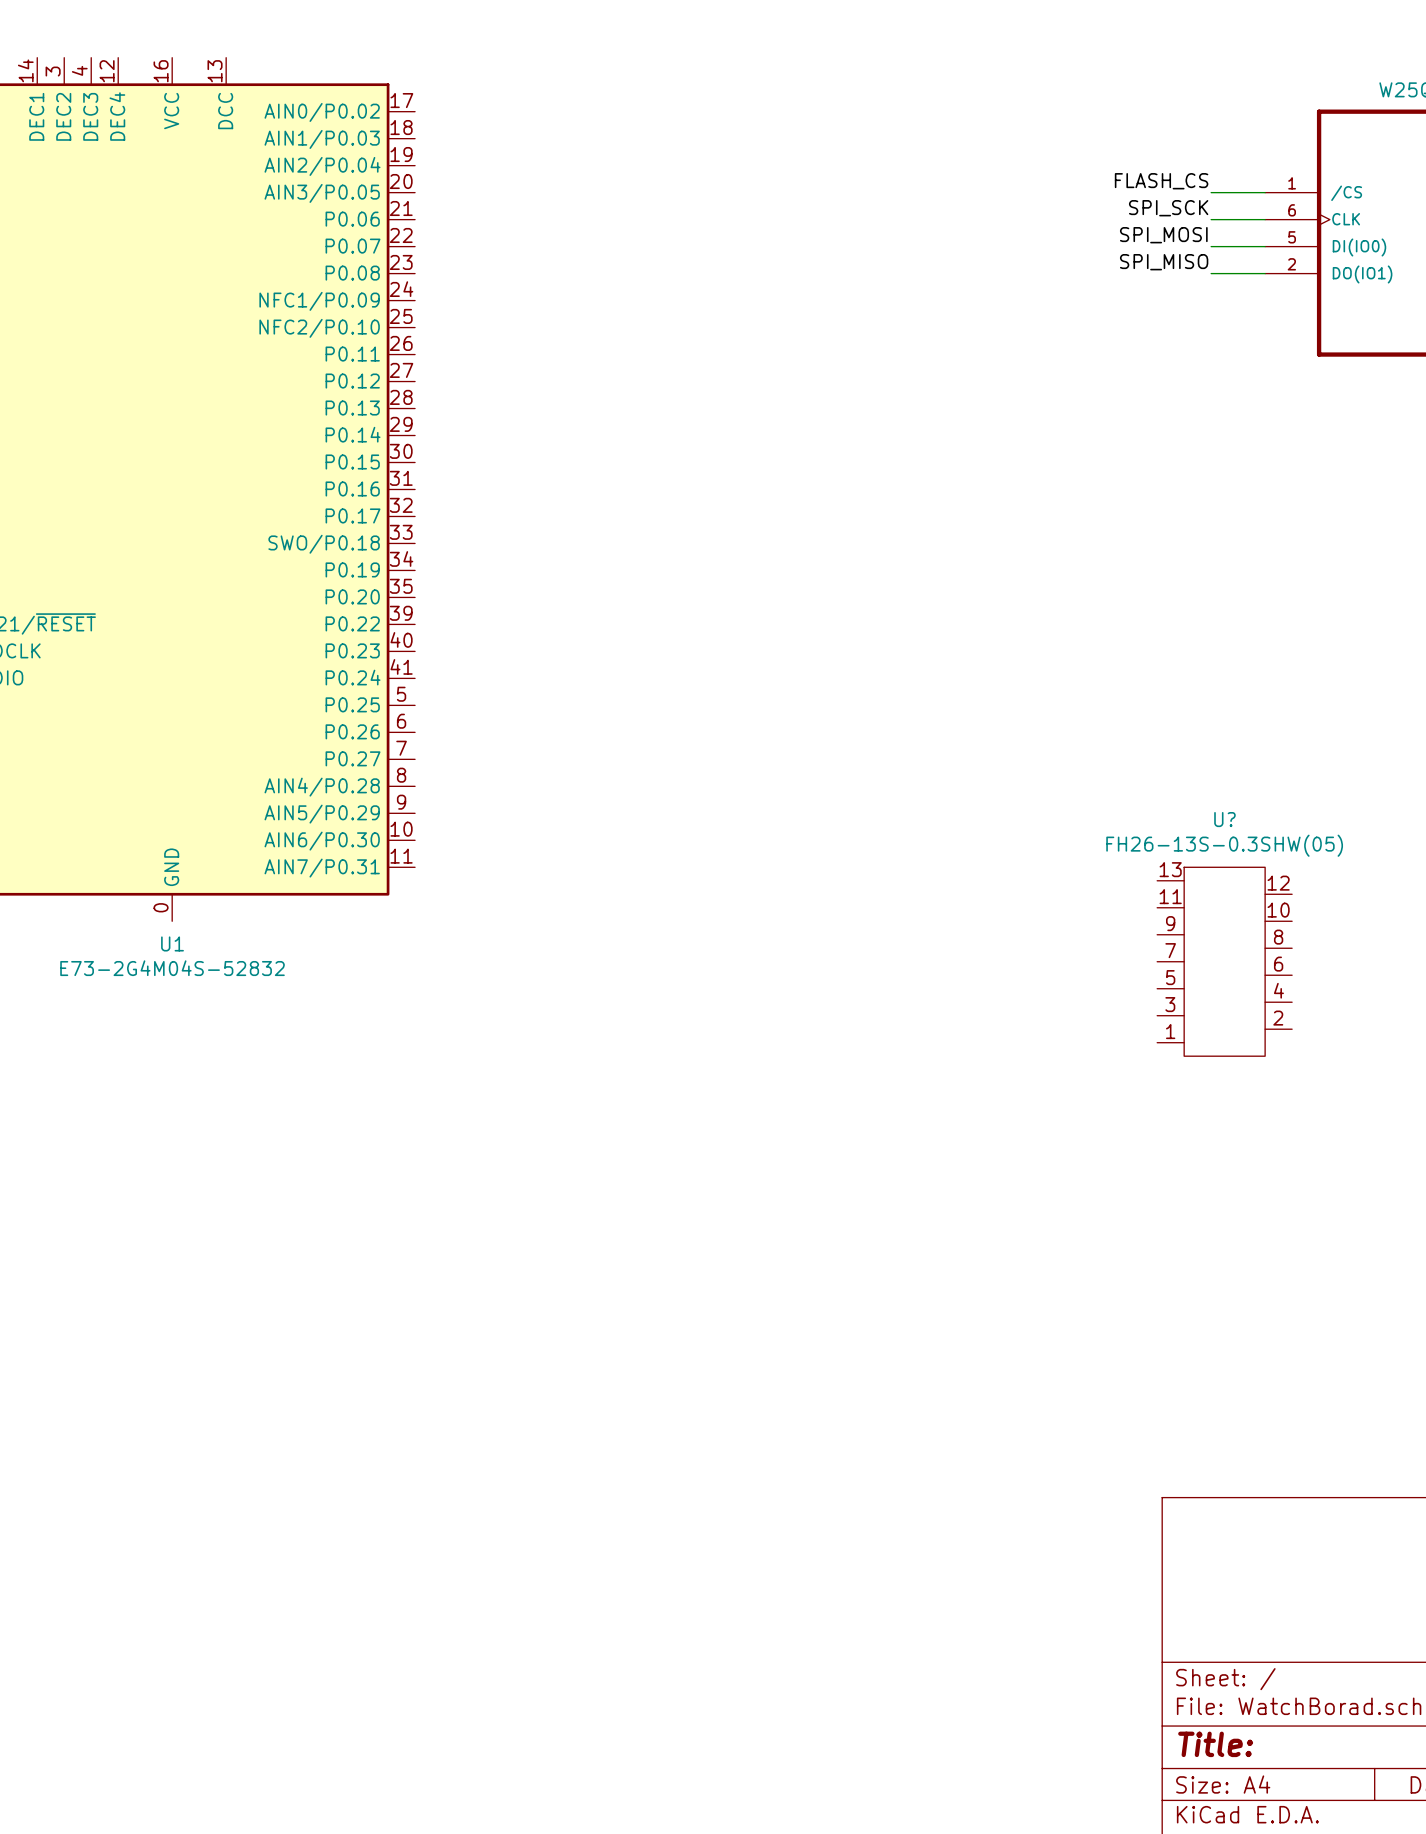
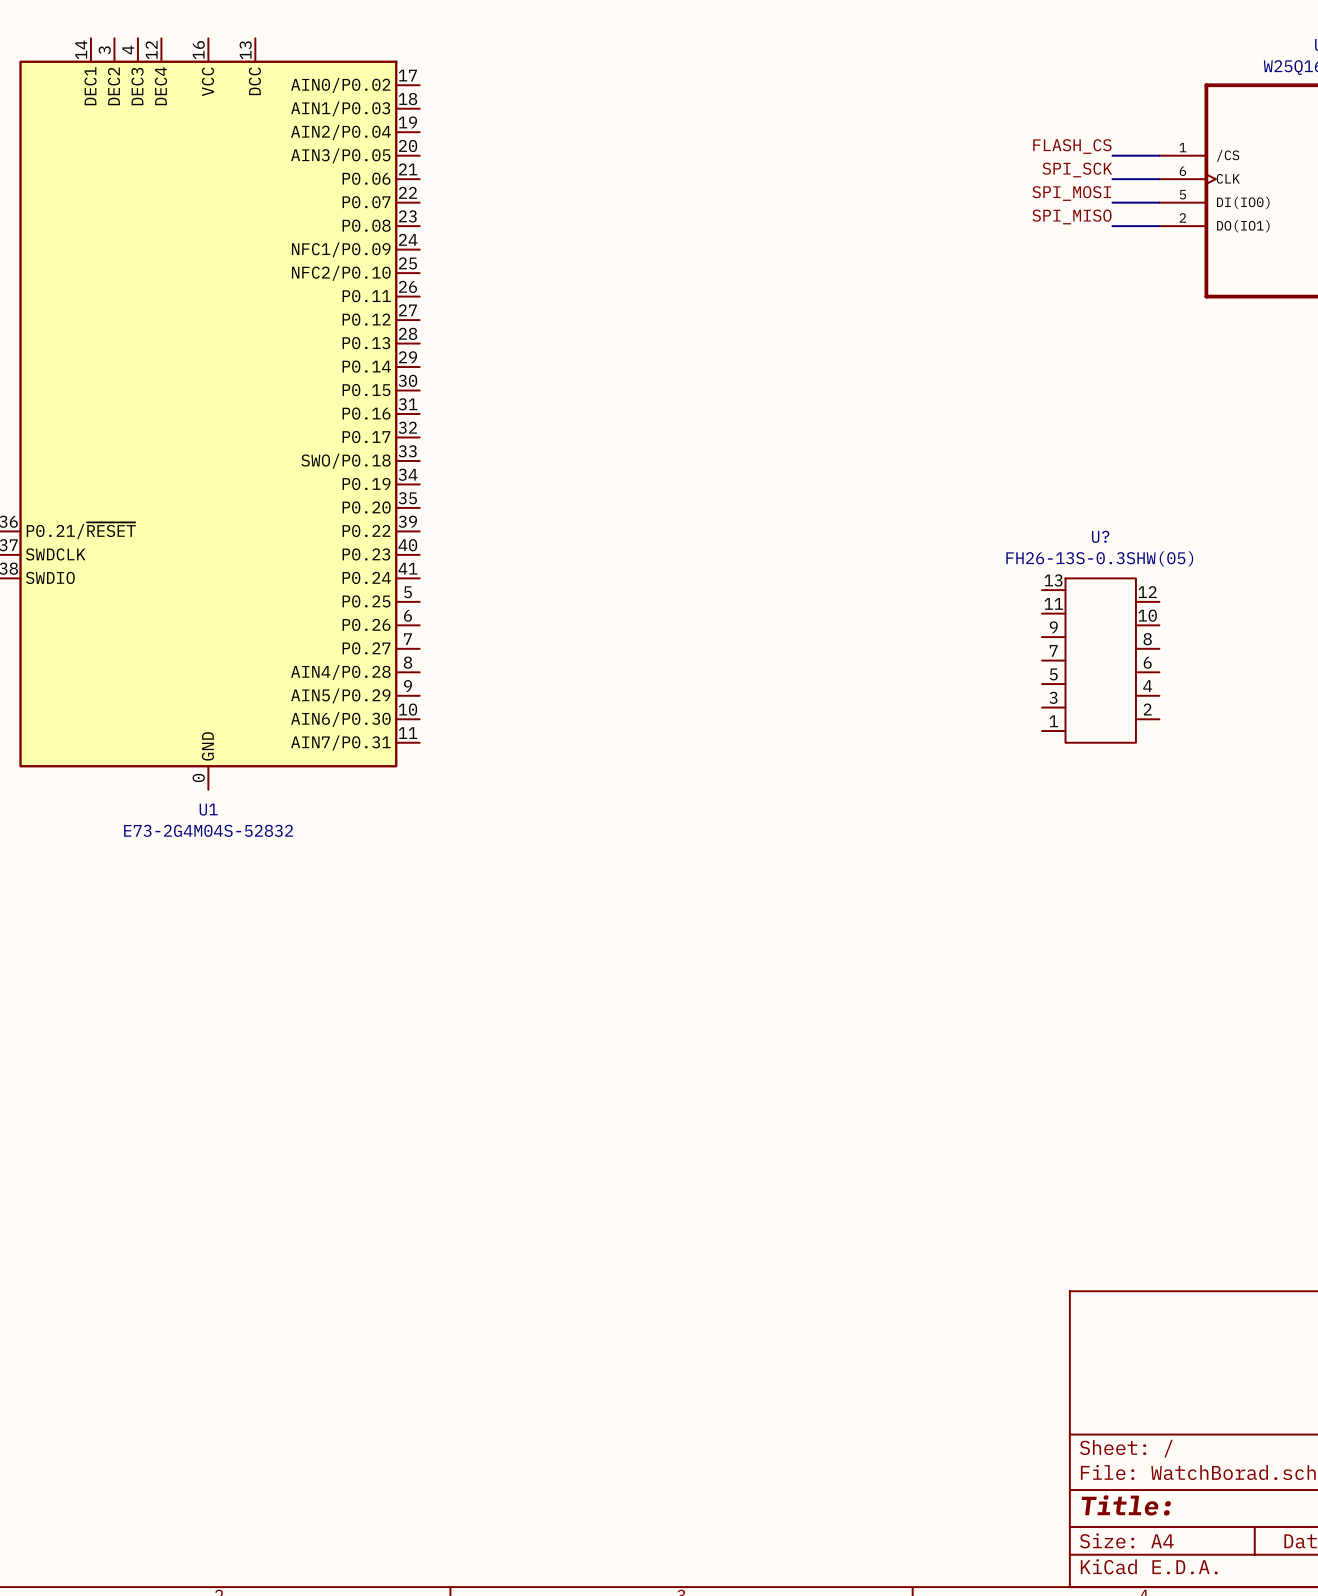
U? position: (1224, 961) -> (1100, 660)

